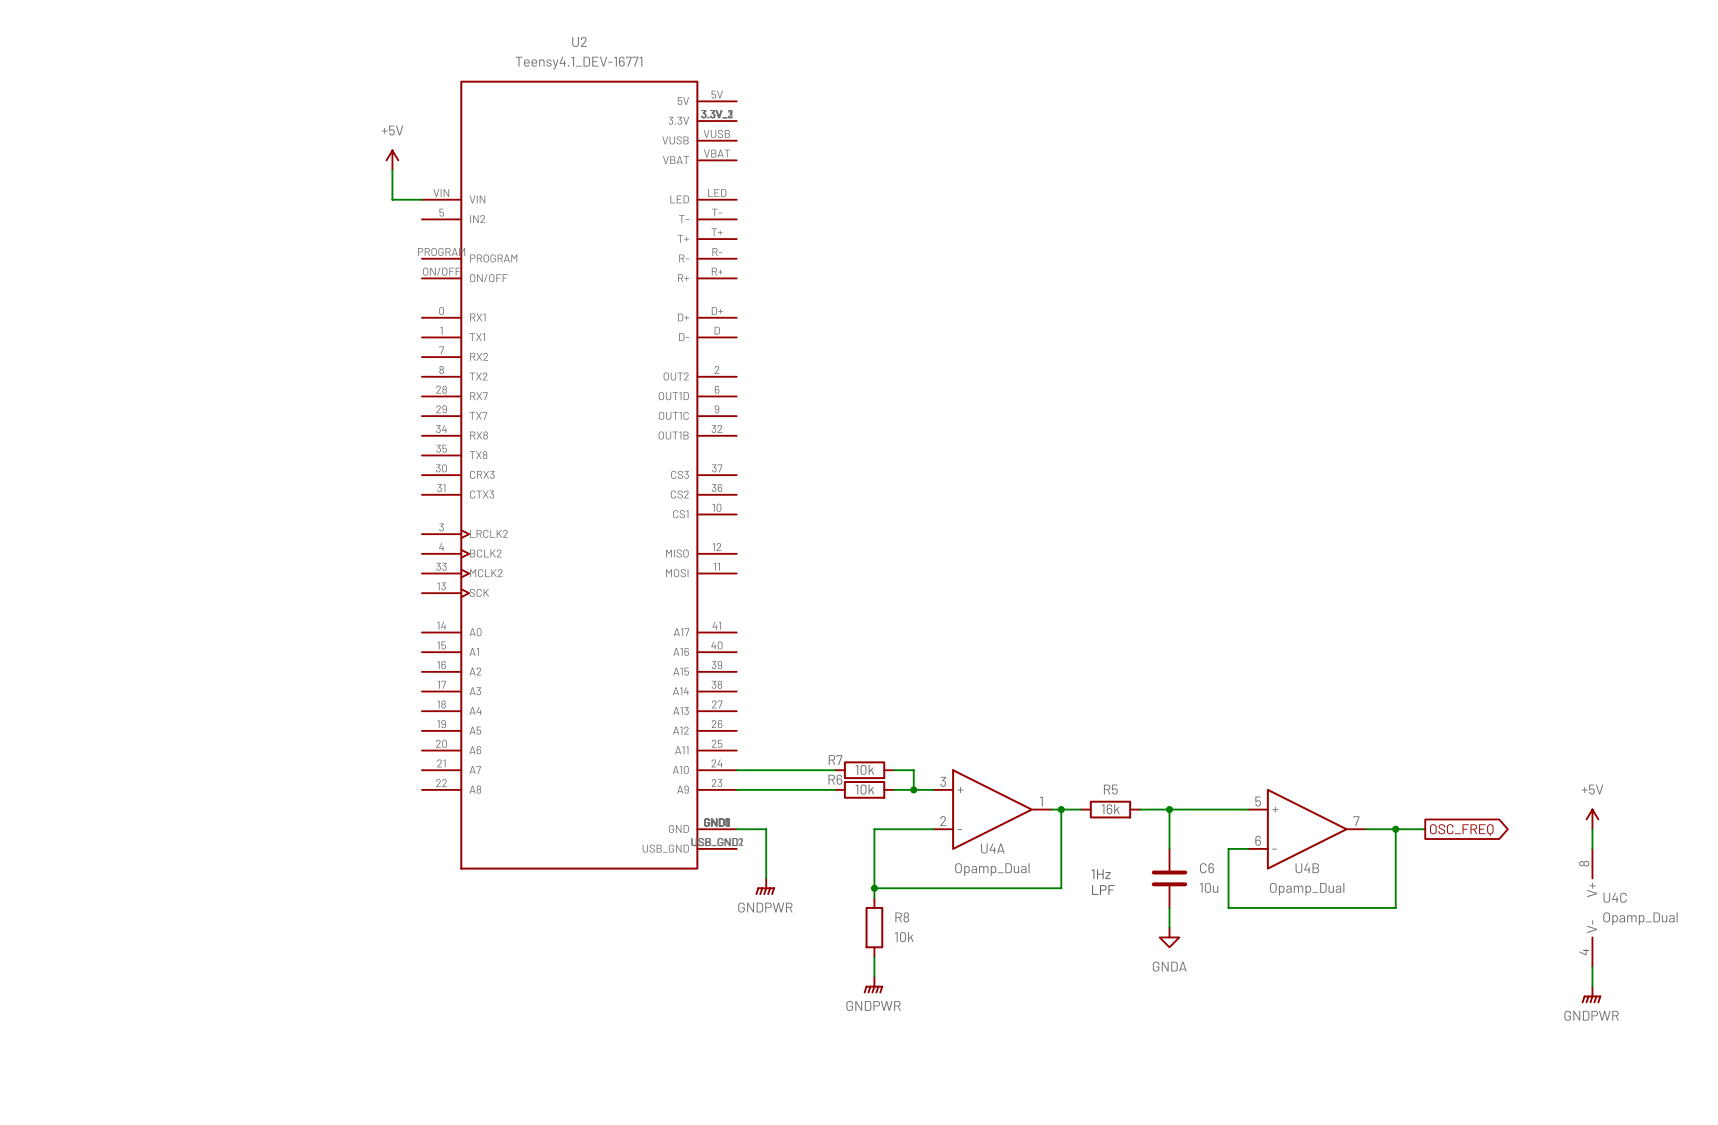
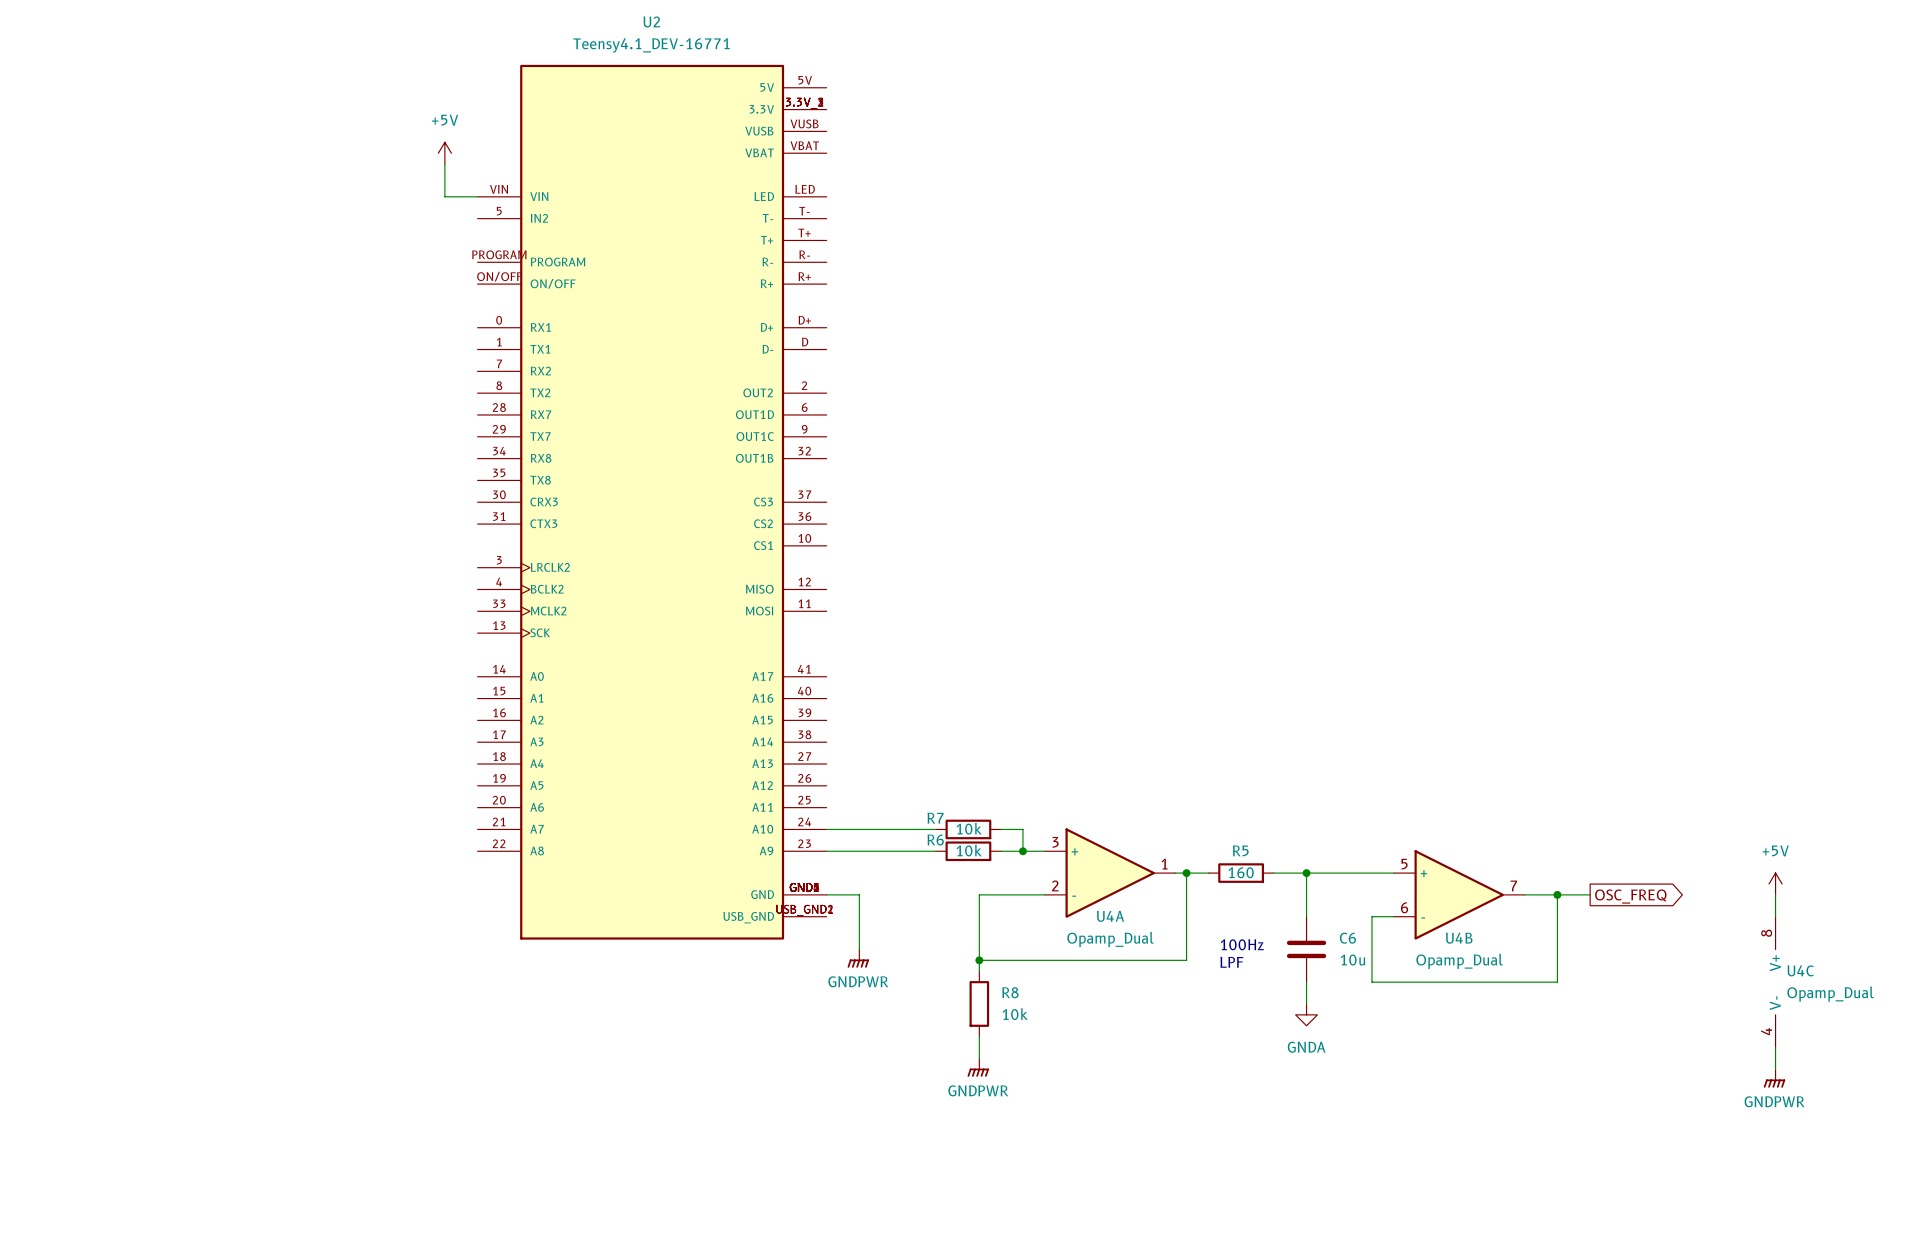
R5 value: 16k (1110, 809) -> 160 (1241, 872)
text: 1Hz (1101, 874) -> 100Hz (1242, 944)

